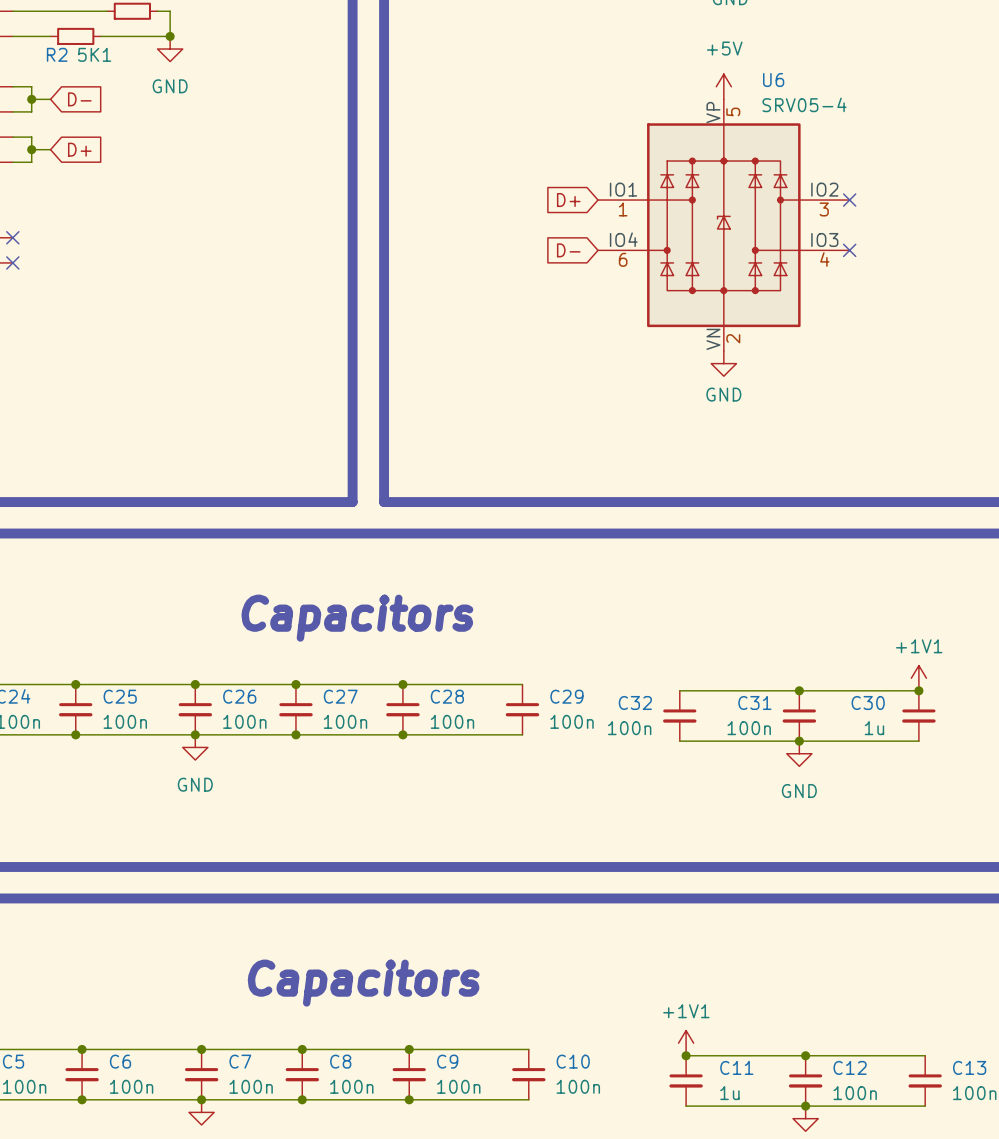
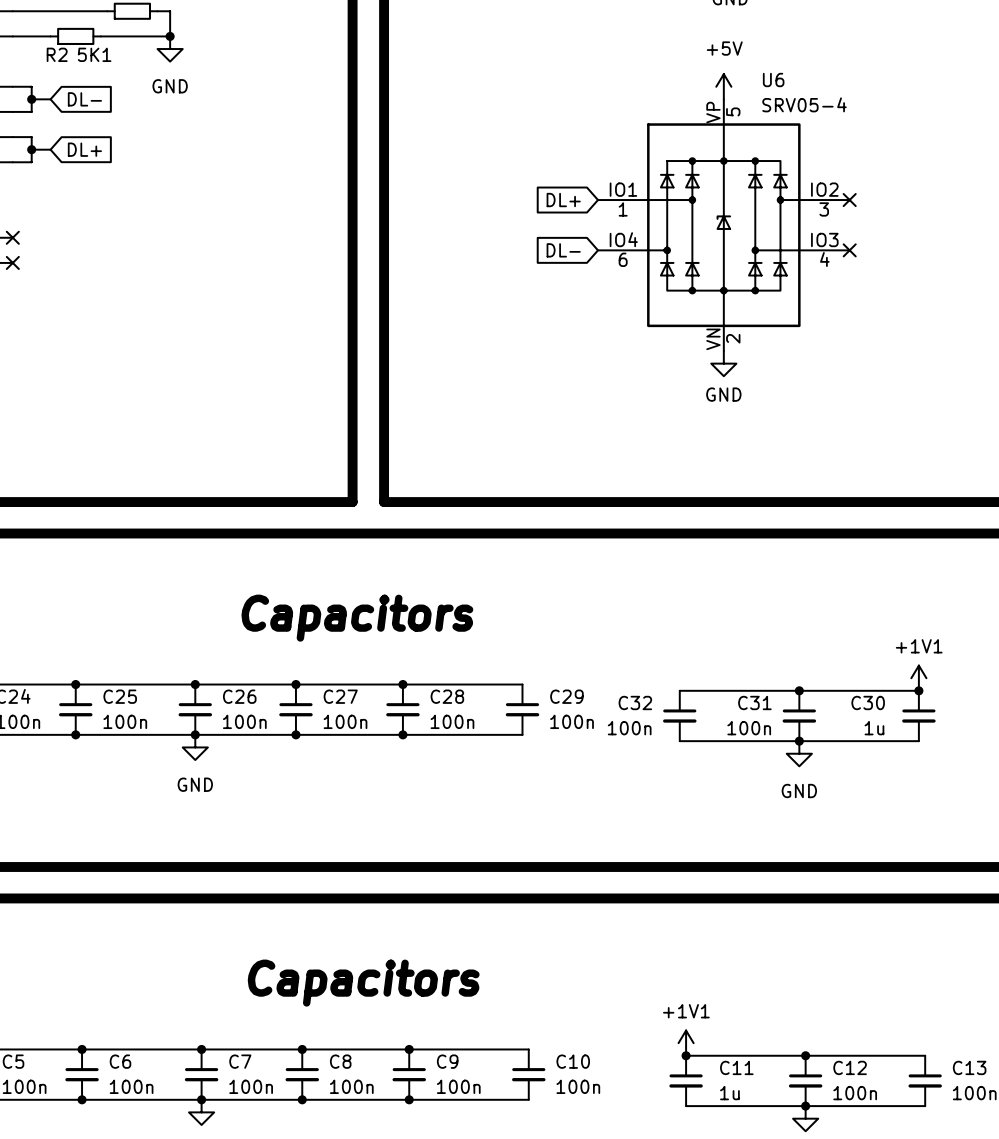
global label: D- (79, 99) -> DL- (84, 99)
global label: D+ (79, 149) -> DL+ (84, 149)
global label: D+ (568, 200) -> DL+ (563, 200)
global label: D- (568, 250) -> DL- (563, 250)

